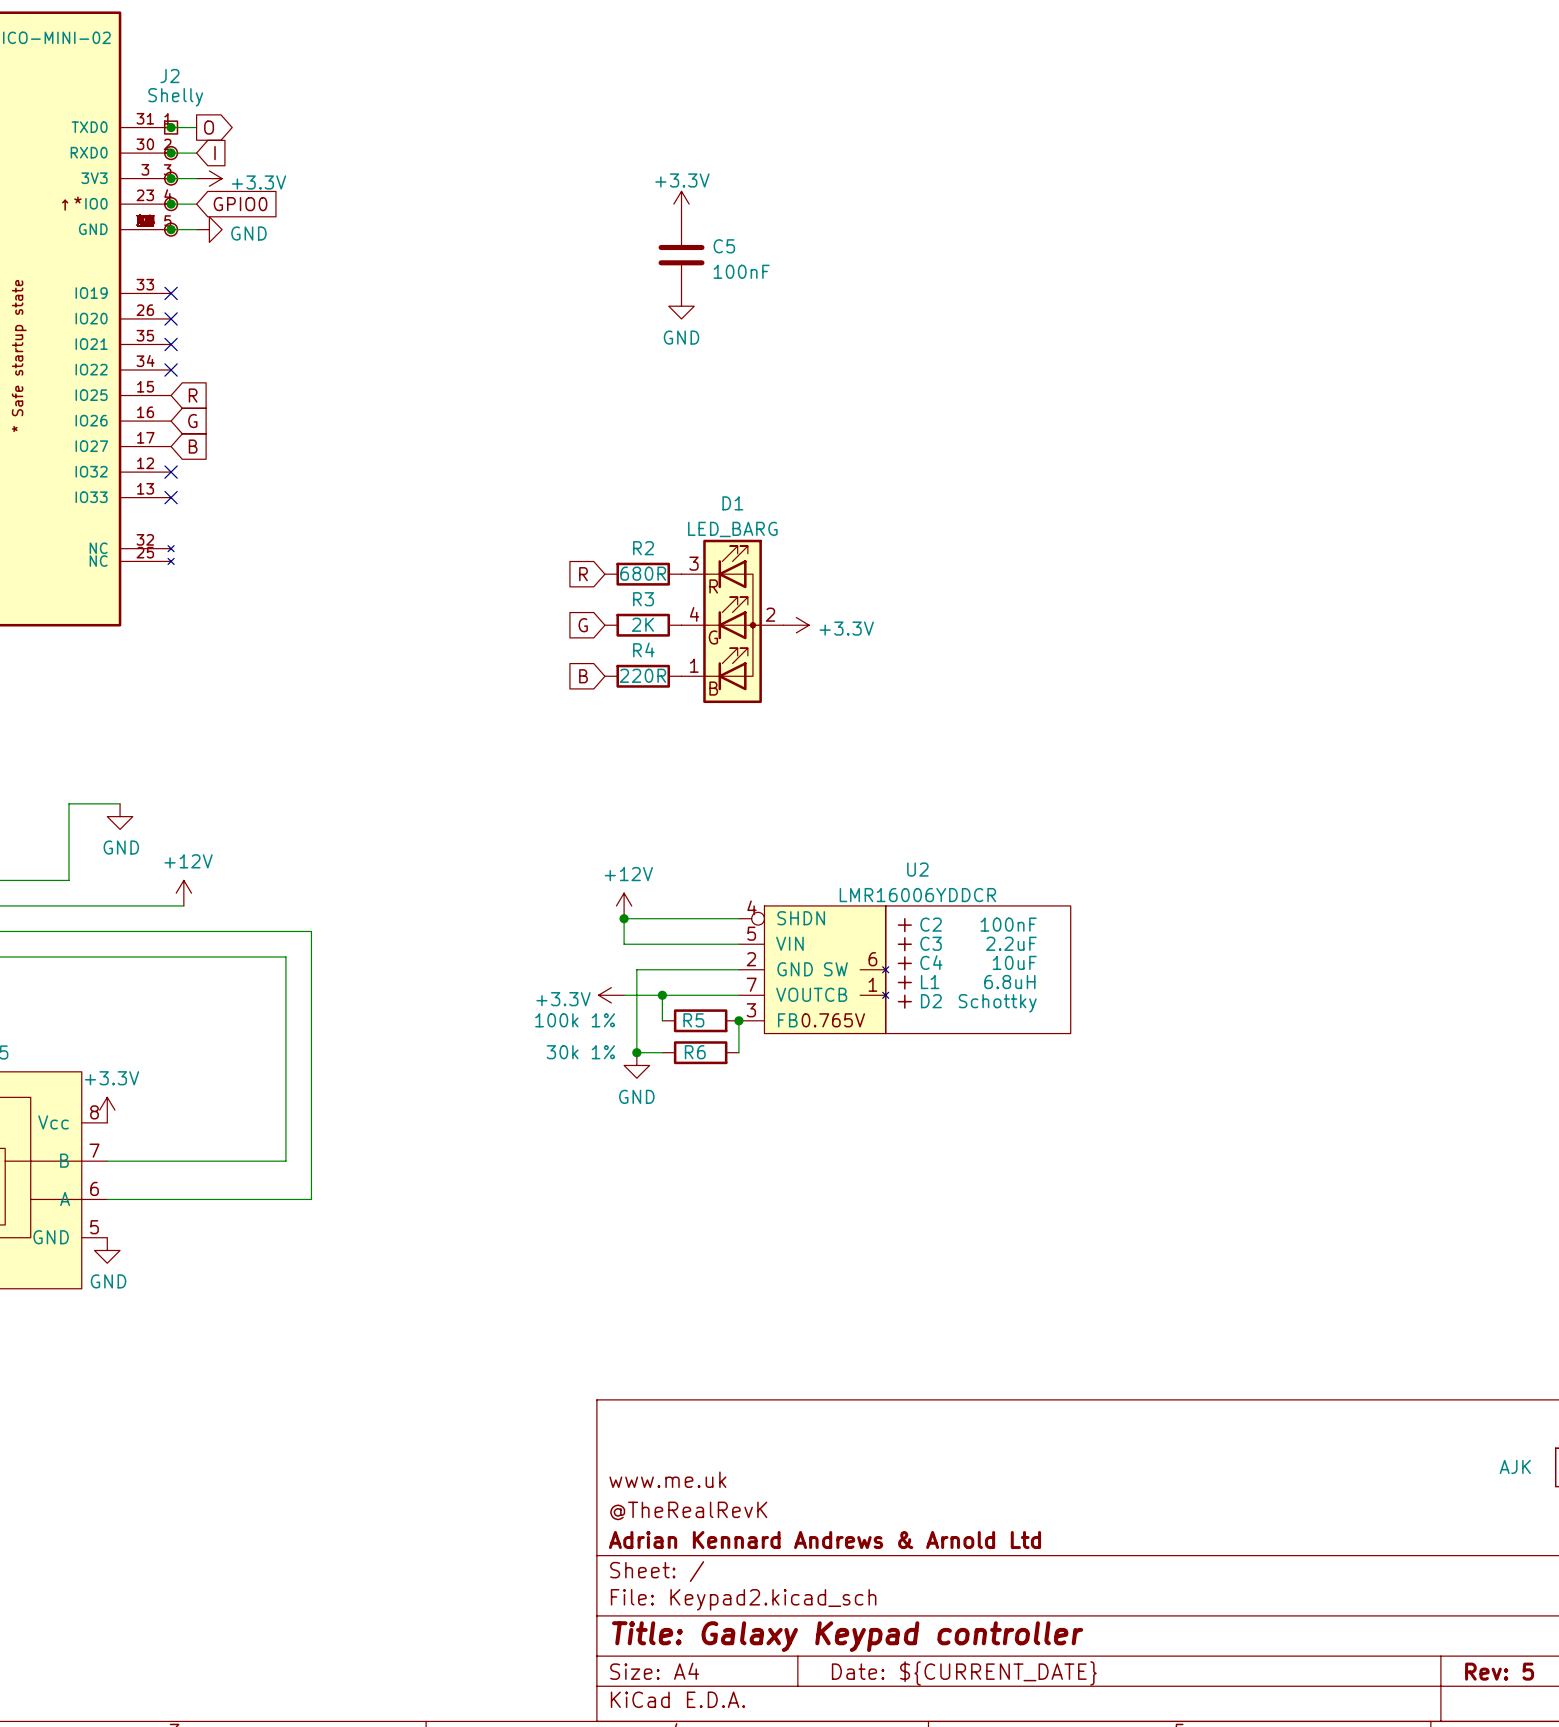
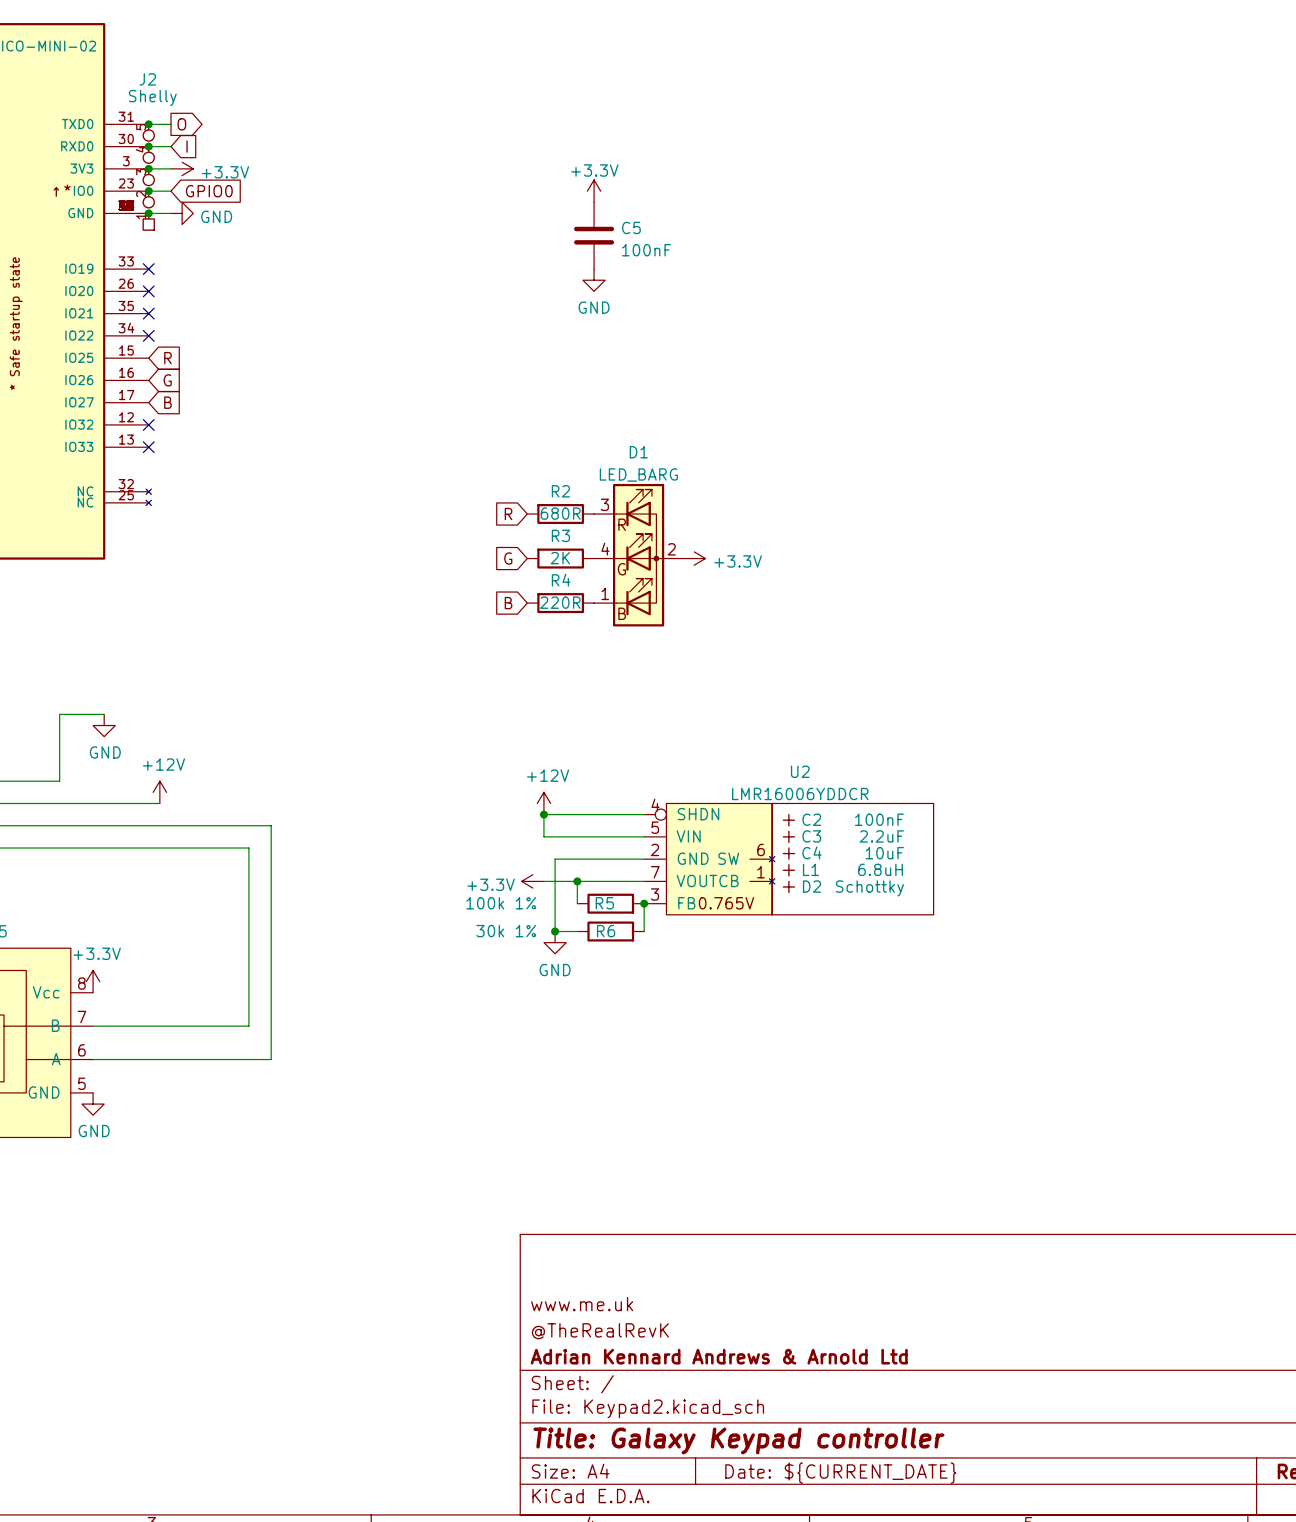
J2 symbol: [163, 120, 179, 237] -> [142, 124, 155, 231]

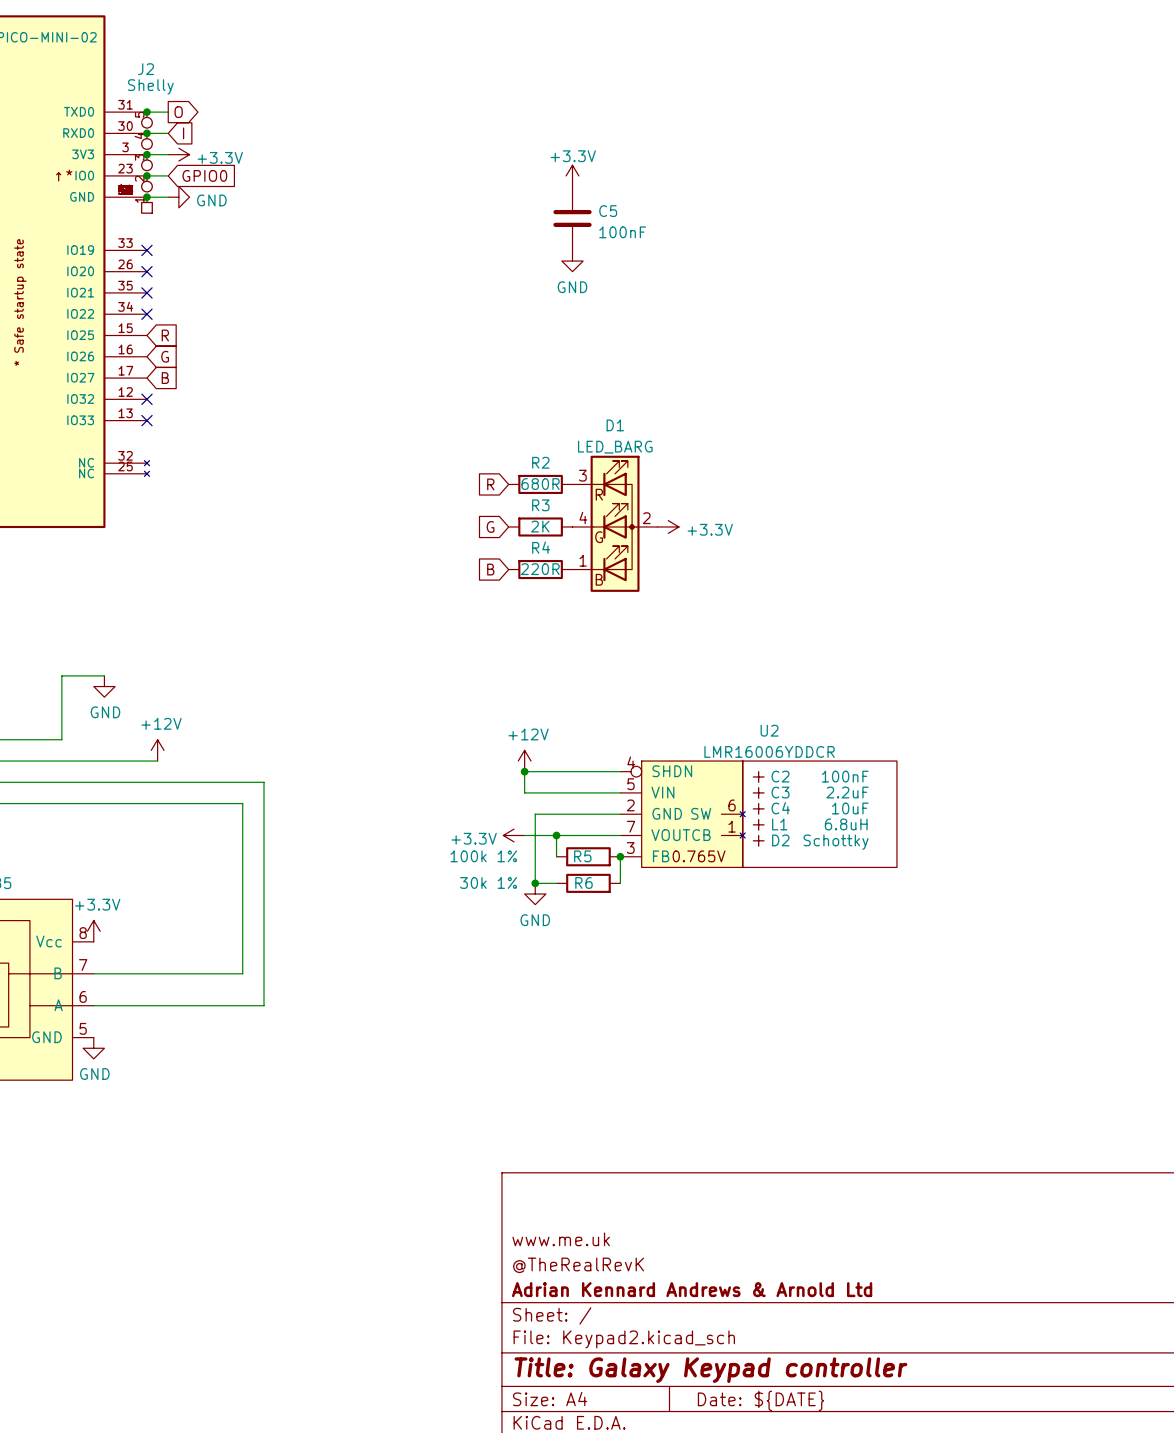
title block: Date: ${CURRENT_DATE} (840, 1473) -> Date: ${DATE} (760, 1400)

